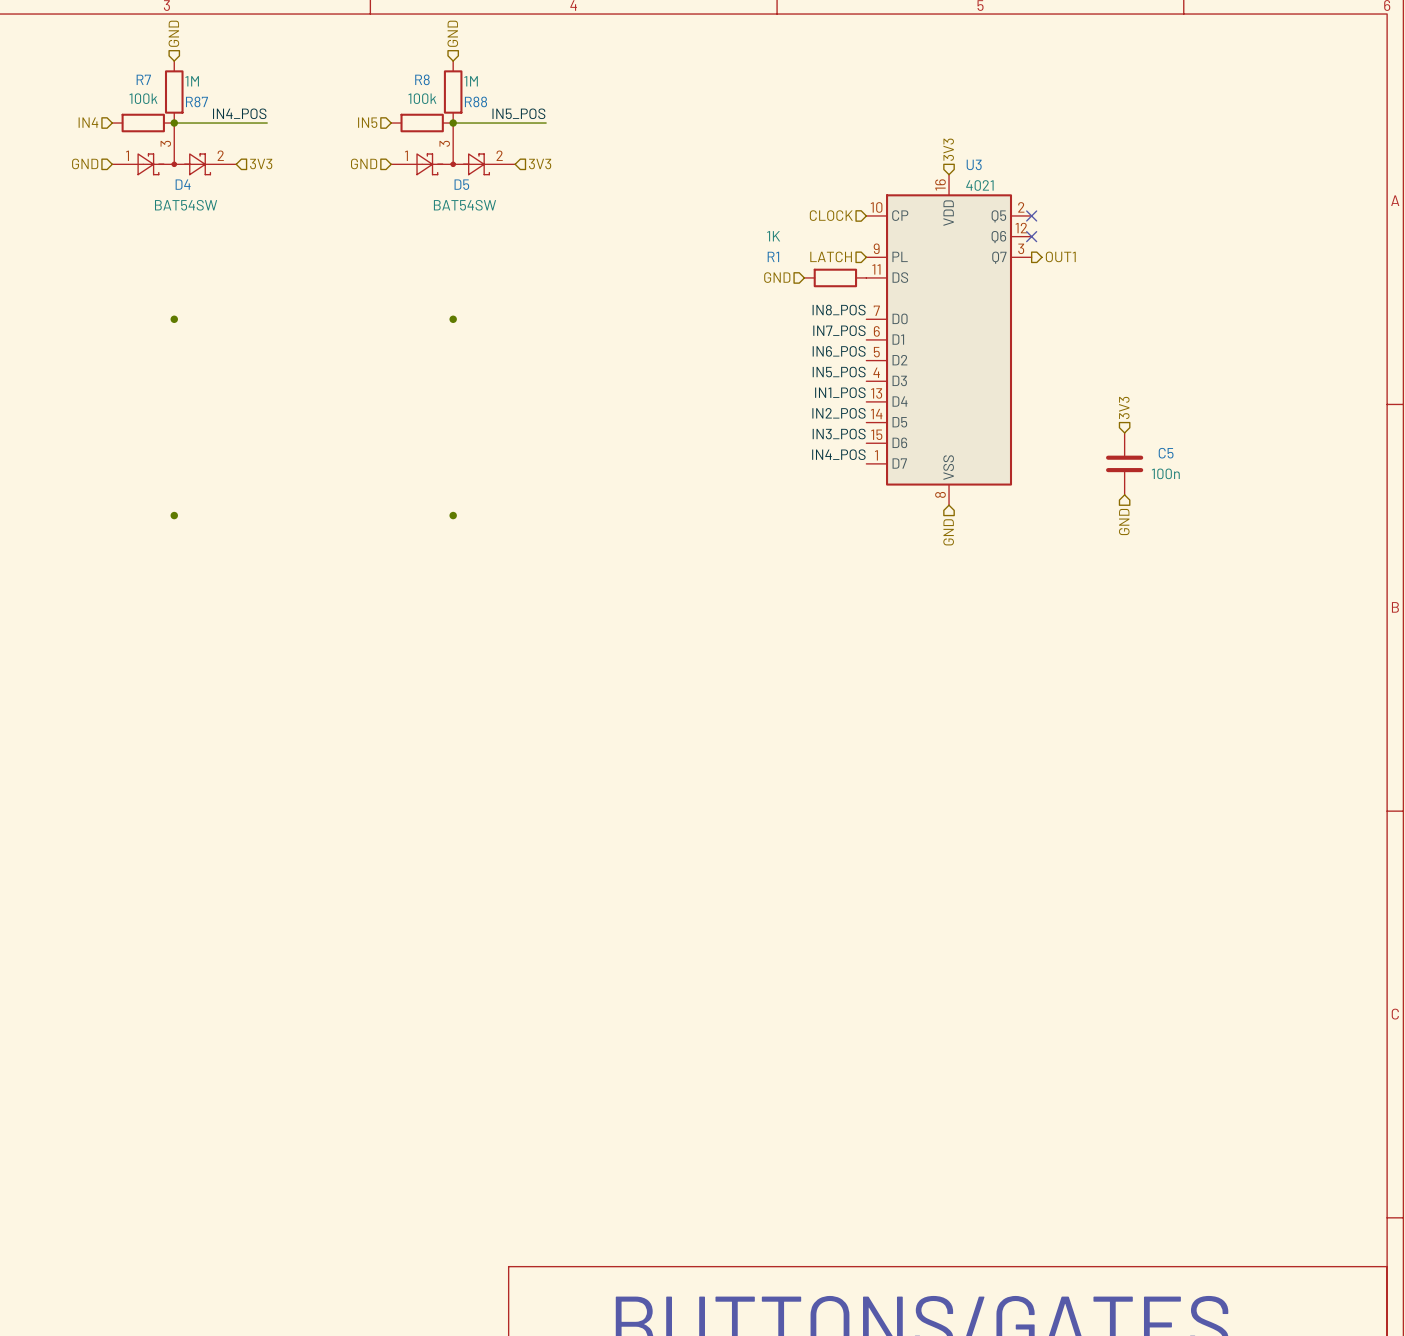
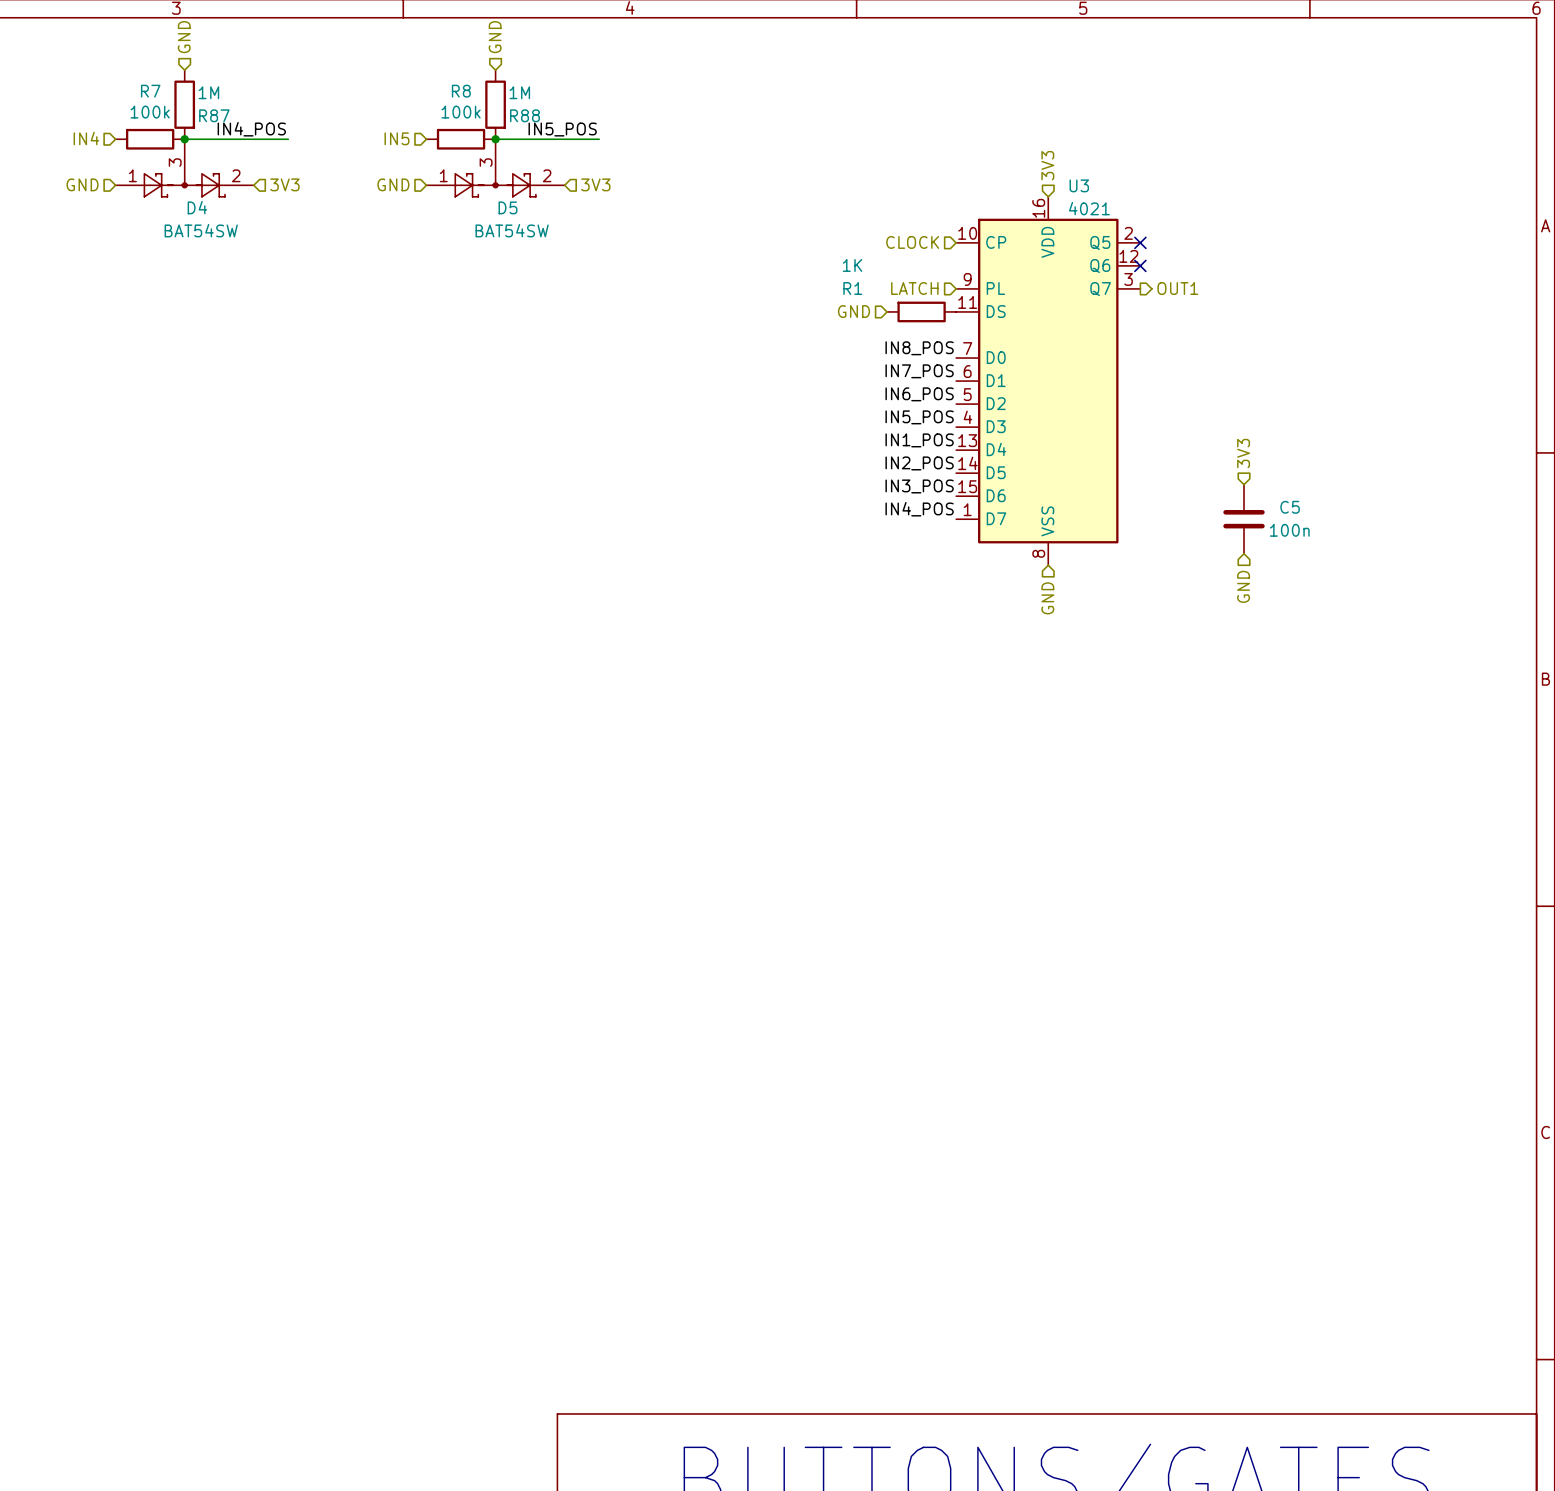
junction: (174, 319) -> none
junction: (453, 319) -> none
junction: (174, 515) -> none
junction: (453, 515) -> none

